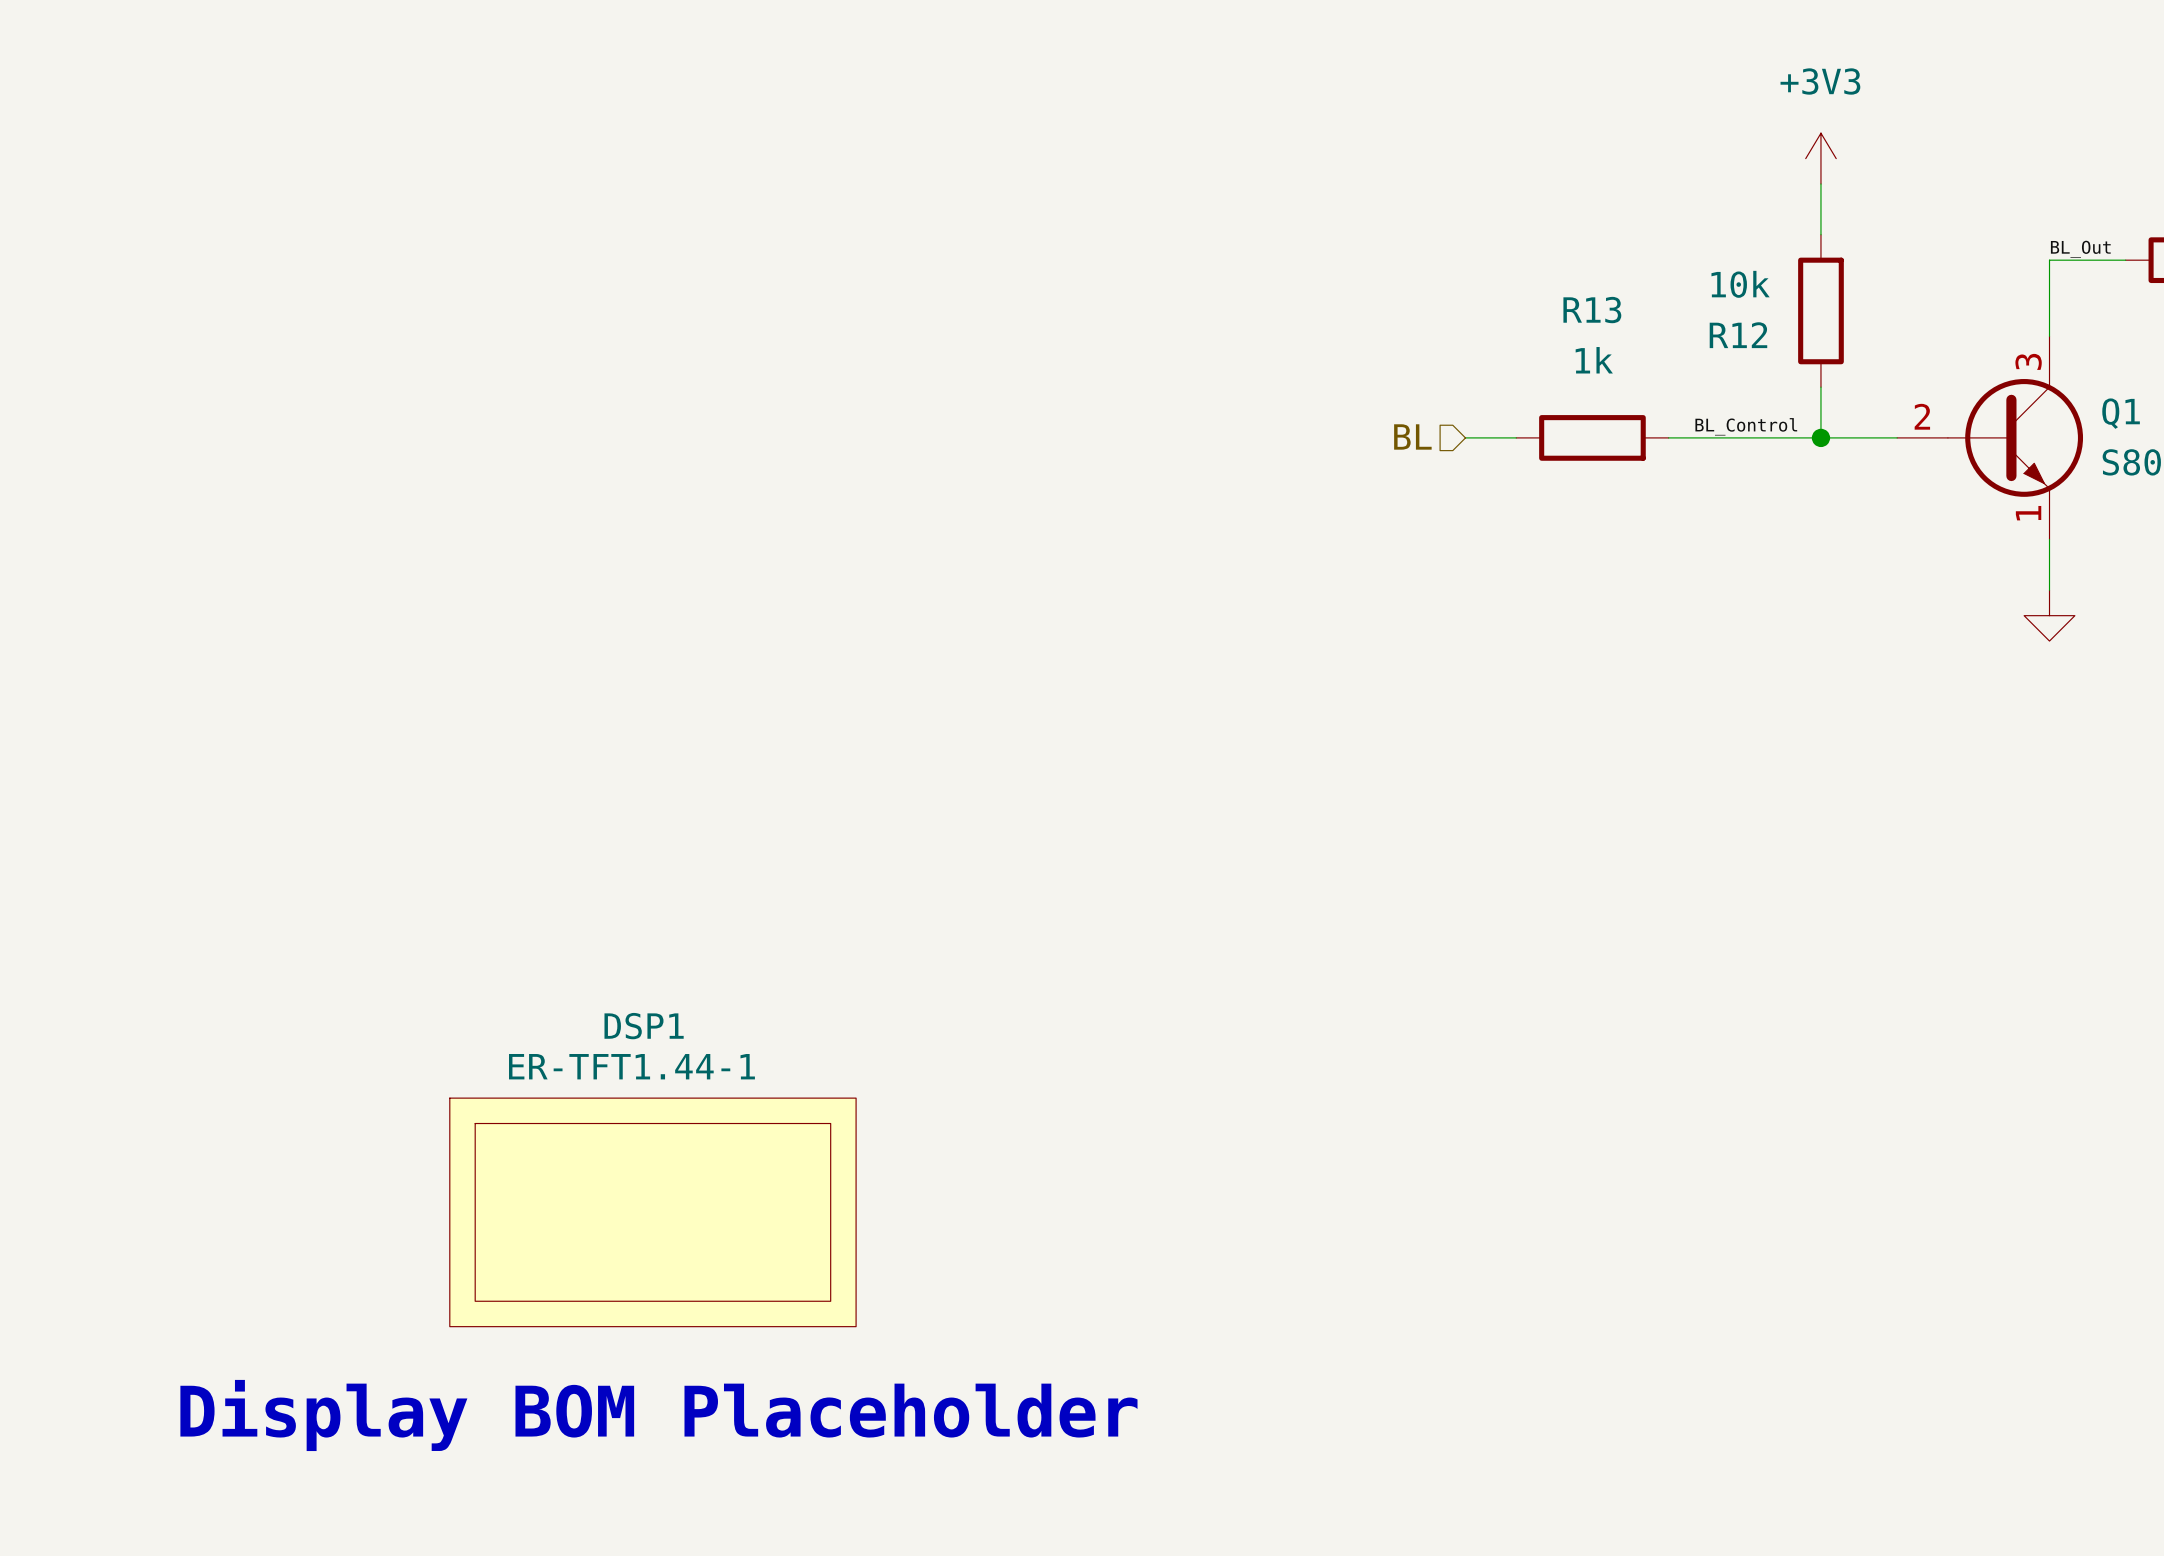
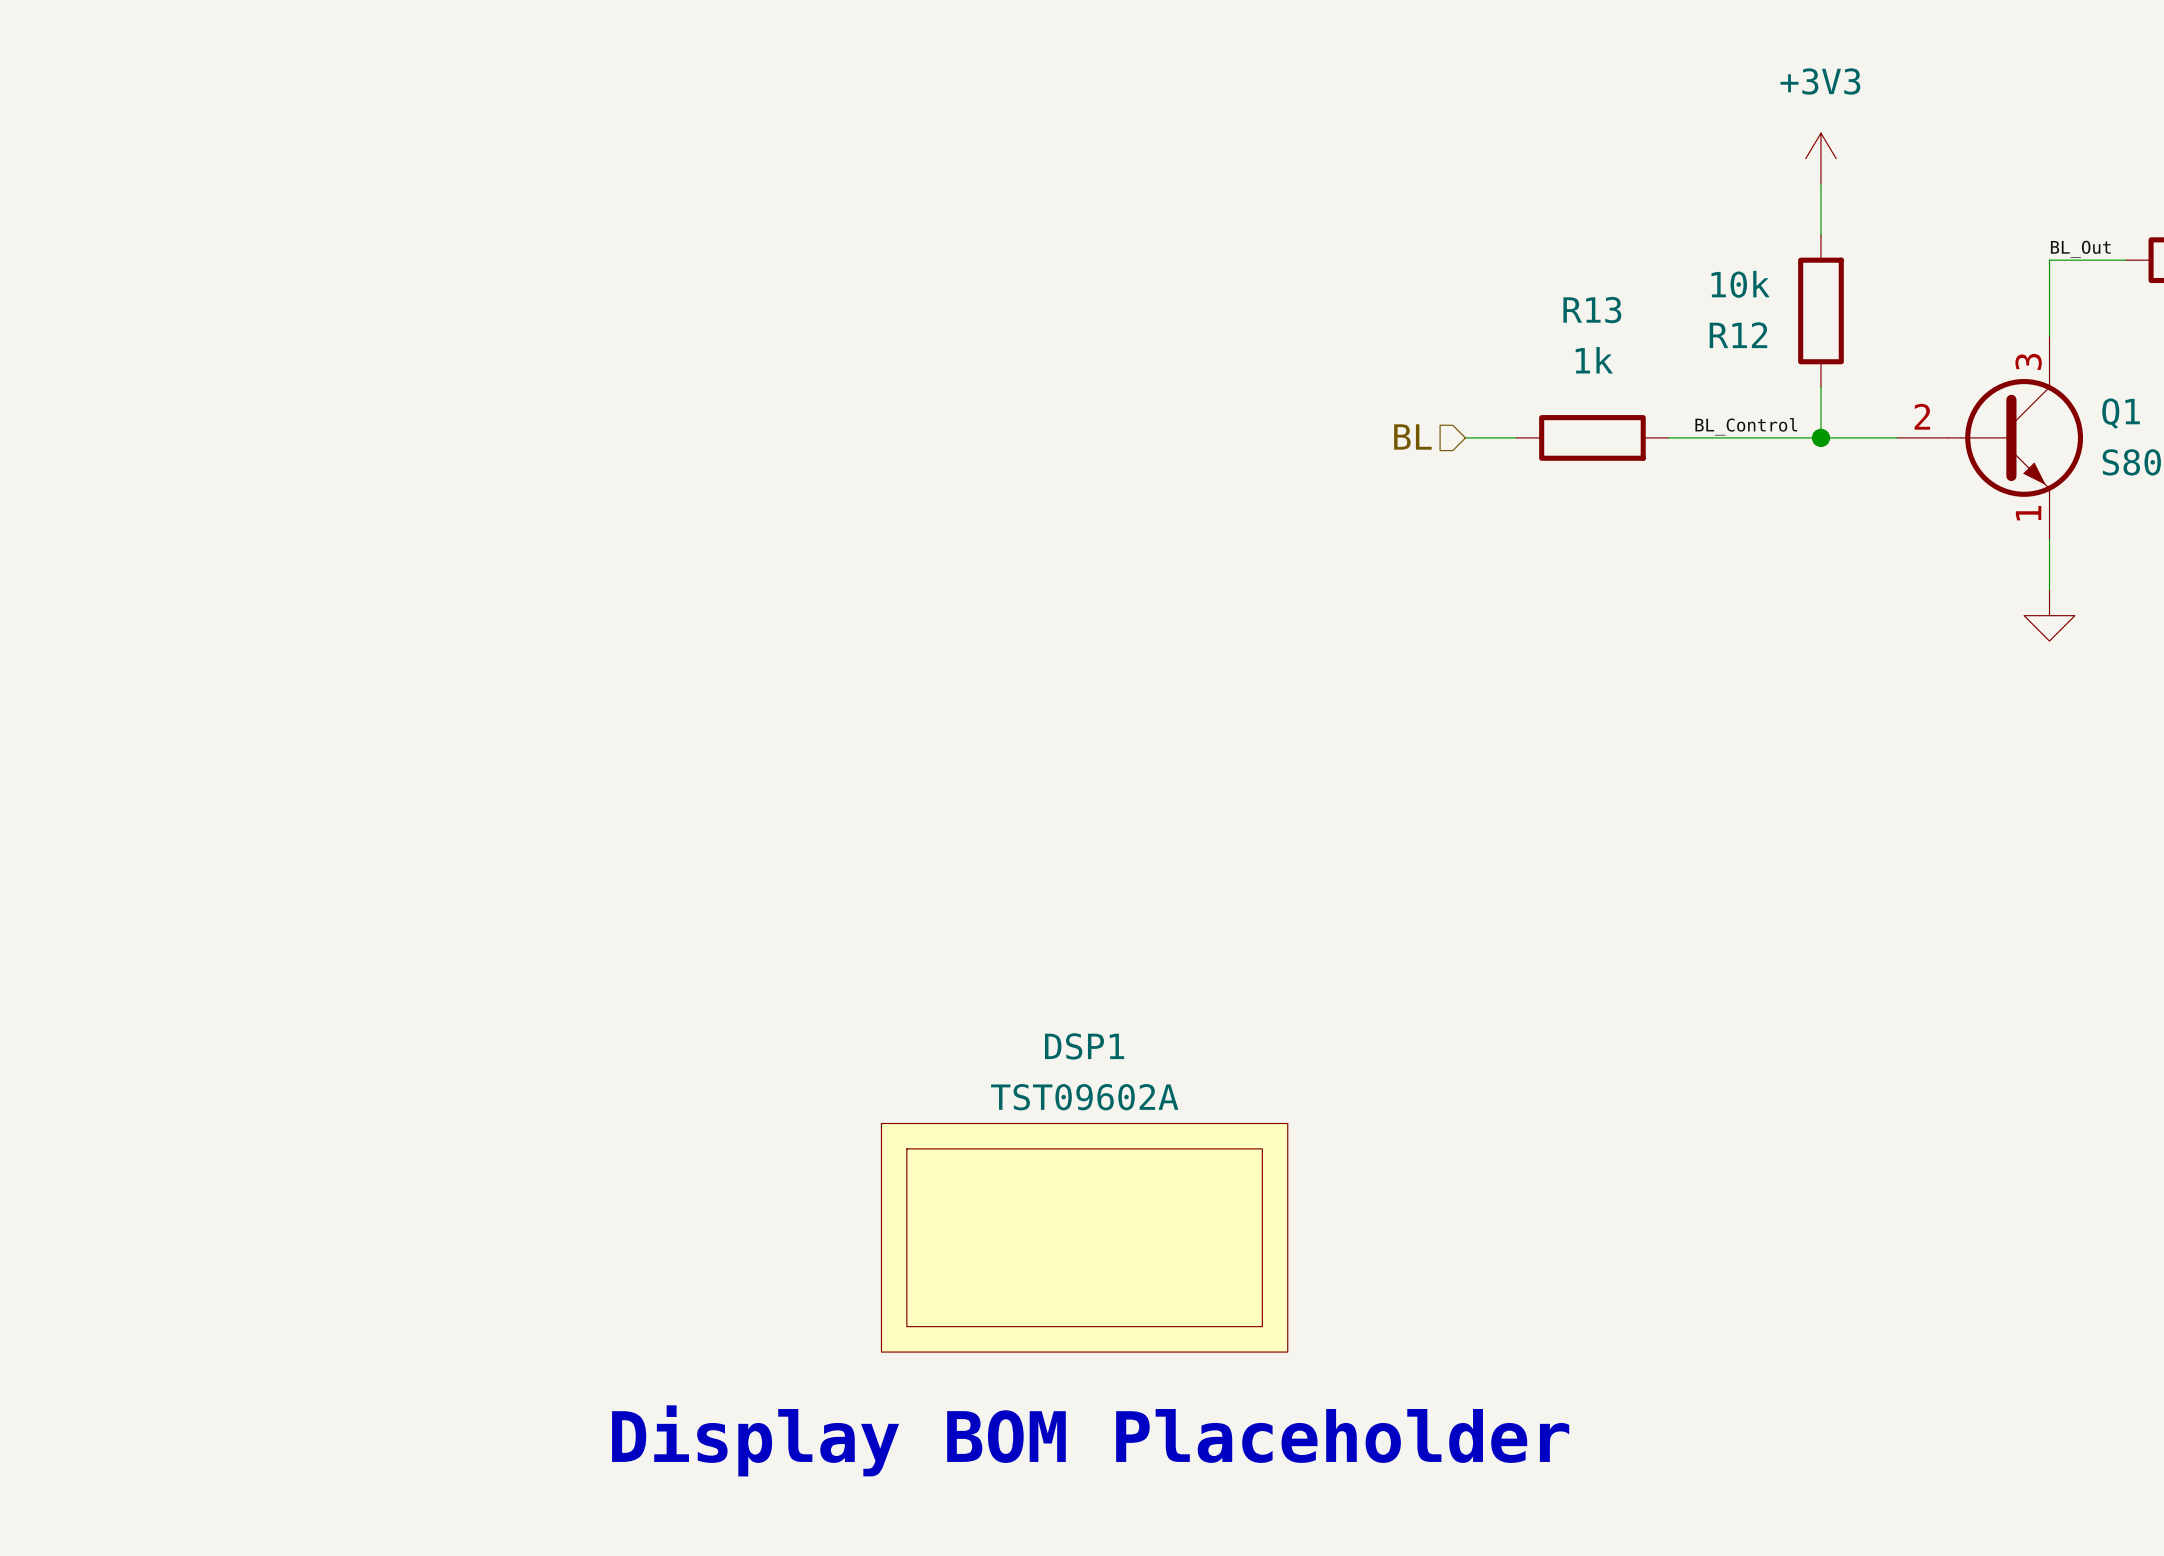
DSP1 name position: DSP1 (644, 1026) -> DSP1 (1084, 1046)
DSP1 value: ER-TFT1.44-1 (631, 1066) -> TST09602A (1084, 1097)
DSP1 position: (652, 1212) -> (1084, 1237)
text position: Display BOM Placeholder (658, 1415) -> Display BOM Placeholder (1090, 1440)

